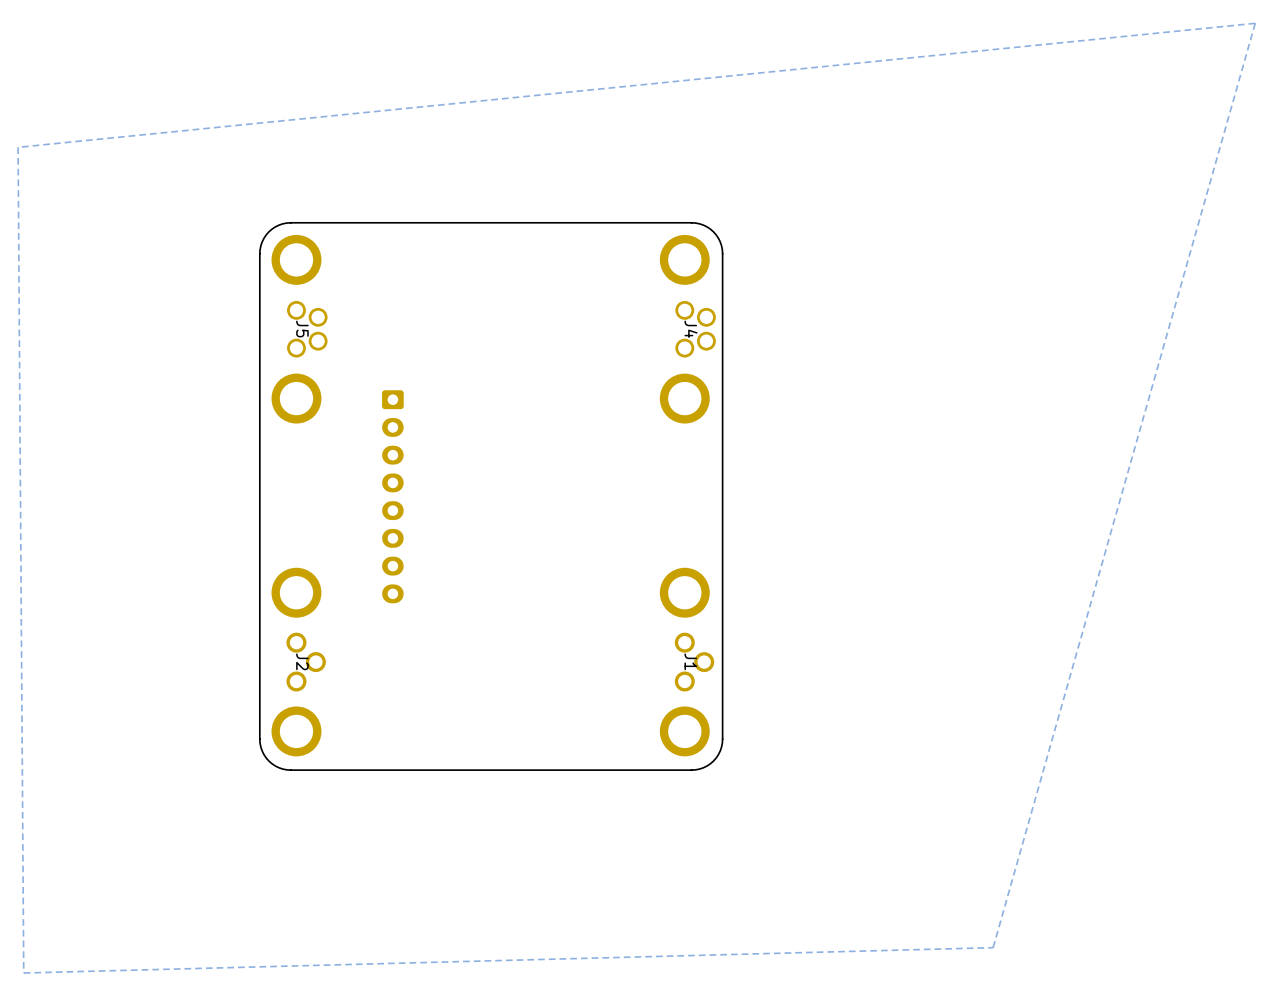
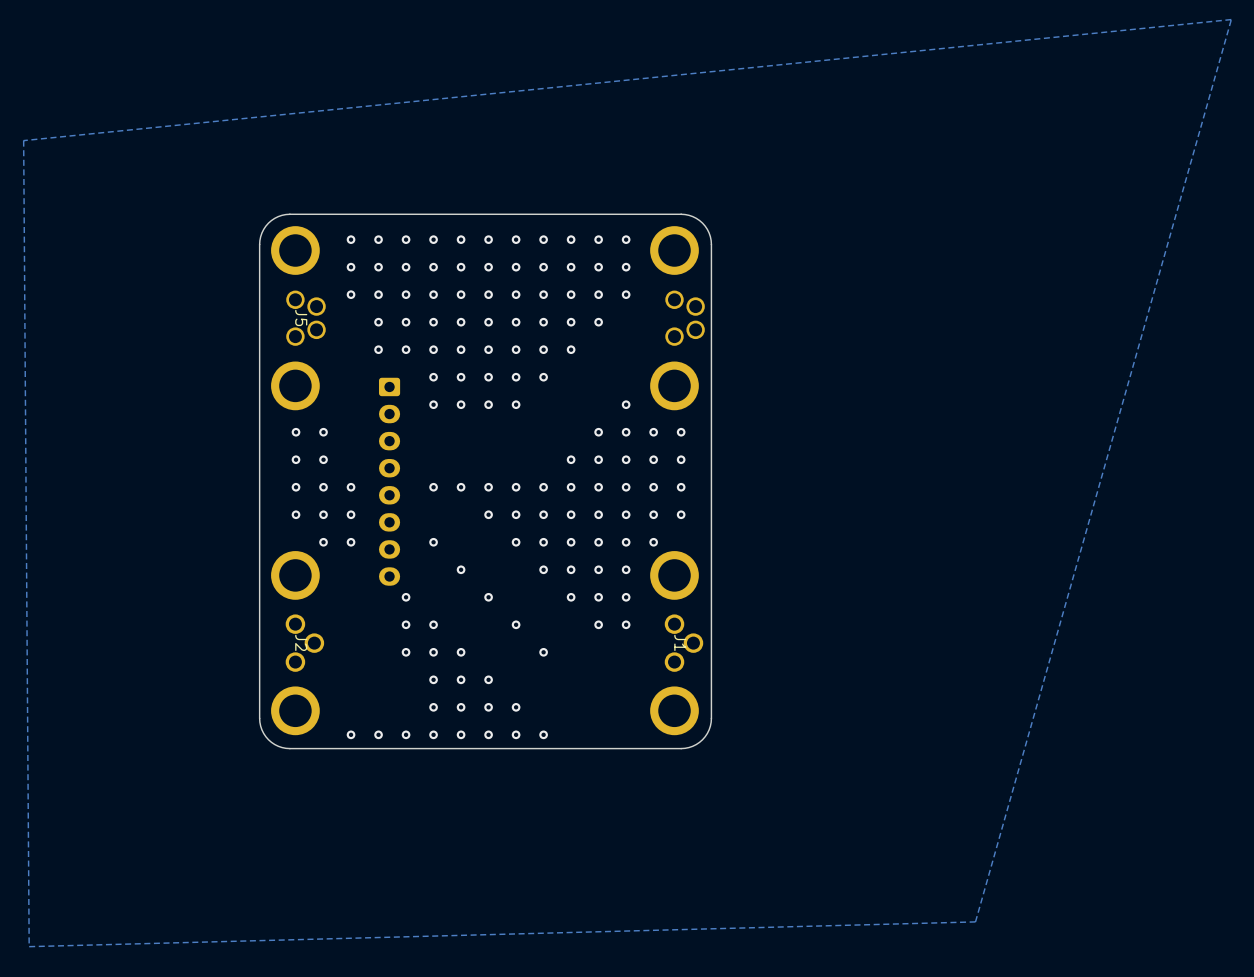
via: none -> (351, 239)
via: none -> (378, 239)
via: none -> (406, 239)
via: none -> (433, 239)
via: none -> (461, 239)
via: none -> (488, 239)
via: none -> (516, 239)
via: none -> (543, 239)
via: none -> (571, 239)
via: none -> (598, 239)
via: none -> (626, 239)
via: none -> (351, 267)
via: none -> (378, 267)
via: none -> (406, 267)
via: none -> (433, 267)
via: none -> (461, 267)
via: none -> (488, 267)
via: none -> (516, 267)
via: none -> (543, 267)
via: none -> (571, 267)
via: none -> (598, 267)
via: none -> (626, 267)
via: none -> (351, 294)
via: none -> (378, 294)
via: none -> (406, 294)
via: none -> (433, 294)
via: none -> (461, 294)
via: none -> (488, 294)
via: none -> (516, 294)
via: none -> (543, 294)
via: none -> (571, 294)
via: none -> (598, 294)
via: none -> (626, 294)
J4 name: J4 (691, 329) -> none
via: none -> (378, 322)
via: none -> (406, 322)
via: none -> (433, 322)
via: none -> (461, 322)
via: none -> (488, 322)
via: none -> (516, 322)
via: none -> (543, 322)
via: none -> (571, 322)
via: none -> (598, 322)
via: none -> (378, 349)
via: none -> (406, 349)
via: none -> (433, 349)
via: none -> (461, 349)
via: none -> (488, 349)
via: none -> (516, 349)
via: none -> (543, 349)
via: none -> (571, 349)
via: none -> (433, 377)
via: none -> (461, 377)
via: none -> (488, 377)
via: none -> (516, 377)
via: none -> (543, 377)
via: none -> (433, 404)
via: none -> (461, 404)
via: none -> (488, 404)
via: none -> (516, 404)
via: none -> (626, 404)
via: none -> (296, 432)
via: none -> (323, 432)
via: none -> (598, 432)
via: none -> (626, 432)
via: none -> (653, 432)
via: none -> (681, 432)
via: none -> (296, 459)
via: none -> (323, 459)
via: none -> (571, 459)
via: none -> (598, 459)
via: none -> (626, 459)
via: none -> (653, 459)
via: none -> (681, 459)
via: none -> (296, 487)
via: none -> (323, 487)
via: none -> (351, 487)
via: none -> (433, 487)
via: none -> (461, 487)
via: none -> (488, 487)
via: none -> (516, 487)
via: none -> (543, 487)
via: none -> (571, 487)
via: none -> (598, 487)
via: none -> (626, 487)
via: none -> (653, 487)
via: none -> (681, 487)
via: none -> (296, 514)
via: none -> (323, 514)
via: none -> (351, 514)
via: none -> (488, 514)
via: none -> (516, 514)
via: none -> (543, 514)
via: none -> (571, 514)
via: none -> (598, 514)
via: none -> (626, 514)
via: none -> (653, 514)
via: none -> (681, 514)
via: none -> (323, 542)
via: none -> (351, 542)
via: none -> (433, 542)
via: none -> (516, 542)
via: none -> (543, 542)
via: none -> (571, 542)
via: none -> (598, 542)
via: none -> (626, 542)
via: none -> (653, 542)
via: none -> (461, 569)
via: none -> (543, 569)
via: none -> (571, 569)
via: none -> (598, 569)
via: none -> (626, 569)
via: none -> (406, 597)
via: none -> (488, 597)
via: none -> (571, 597)
via: none -> (598, 597)
via: none -> (626, 597)
via: none -> (406, 624)
via: none -> (433, 624)
via: none -> (516, 624)
via: none -> (598, 624)
via: none -> (626, 624)
via: none -> (406, 652)
via: none -> (433, 652)
via: none -> (461, 652)
via: none -> (543, 652)
via: none -> (433, 679)
via: none -> (461, 679)
via: none -> (488, 679)
via: none -> (433, 707)
via: none -> (461, 707)
via: none -> (488, 707)
via: none -> (516, 707)
via: none -> (351, 734)
via: none -> (378, 734)
via: none -> (406, 734)
via: none -> (433, 734)
via: none -> (461, 734)
via: none -> (488, 734)
via: none -> (516, 734)
via: none -> (543, 734)

